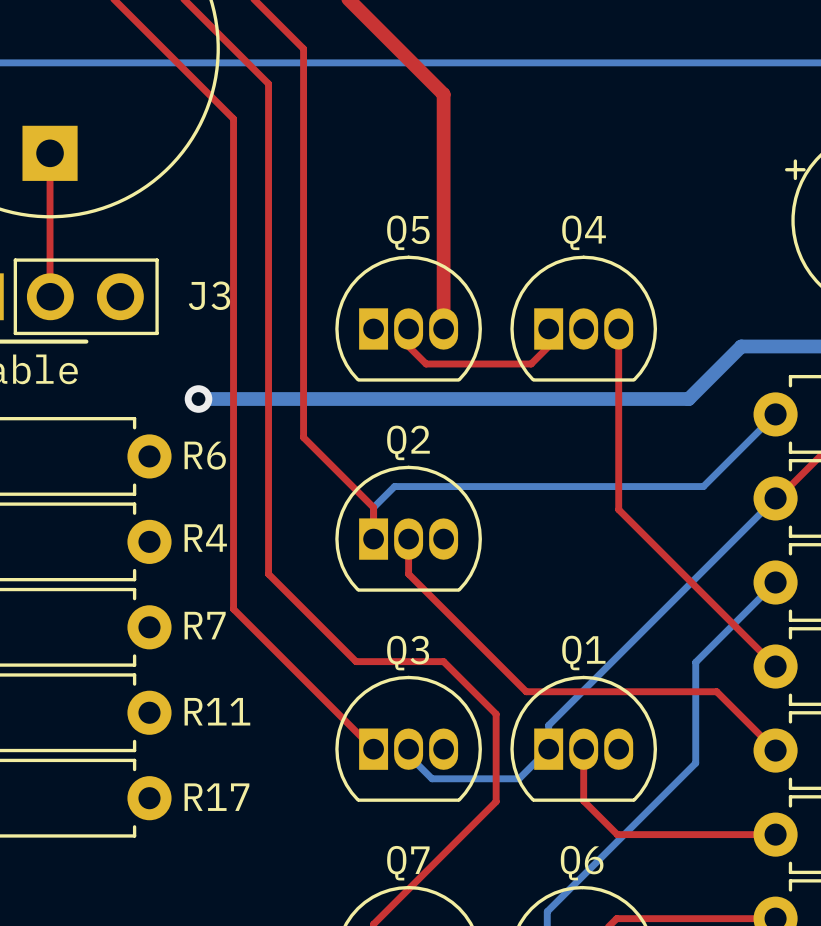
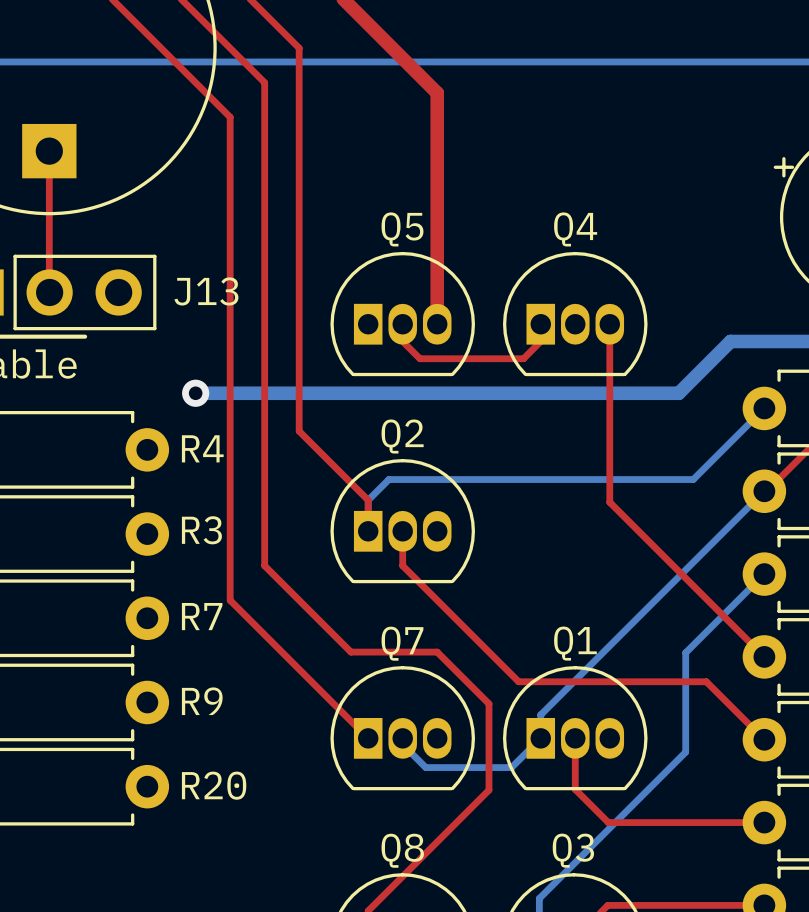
J3 name: J3 (209, 295) -> J13 (206, 291)
R6 name: R6 (205, 455) -> R4 (202, 448)
R4 name: R4 (205, 538) -> R3 (201, 530)
Q3 name: Q3 (408, 653) -> Q7 (402, 643)
R11 name: R11 (217, 711) -> R9 (202, 701)
R17 name: R17 (216, 797) -> R20 (214, 785)
Q7 name: Q7 (408, 863) -> Q8 (402, 850)
Q6 name: Q6 (582, 863) -> Q3 (573, 850)

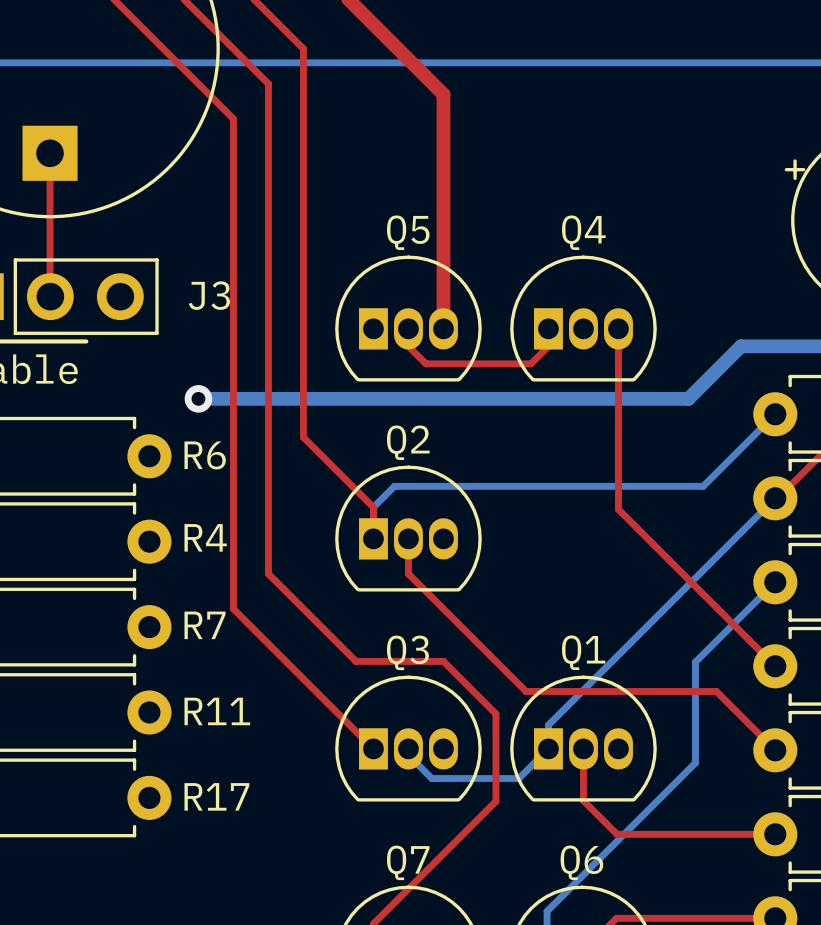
J13 name: J13 (206, 291) -> J3 (209, 295)
R4 name: R4 (202, 448) -> R6 (205, 455)
R3 name: R3 (201, 530) -> R4 (205, 537)
Q7 name: Q7 (402, 643) -> Q3 (407, 652)
R9 name: R9 (202, 701) -> R11 (217, 711)
R20 name: R20 (214, 785) -> R17 (216, 796)
Q8 name: Q8 (402, 850) -> Q7 (408, 862)
Q3 name: Q3 (573, 850) -> Q6 (581, 862)

